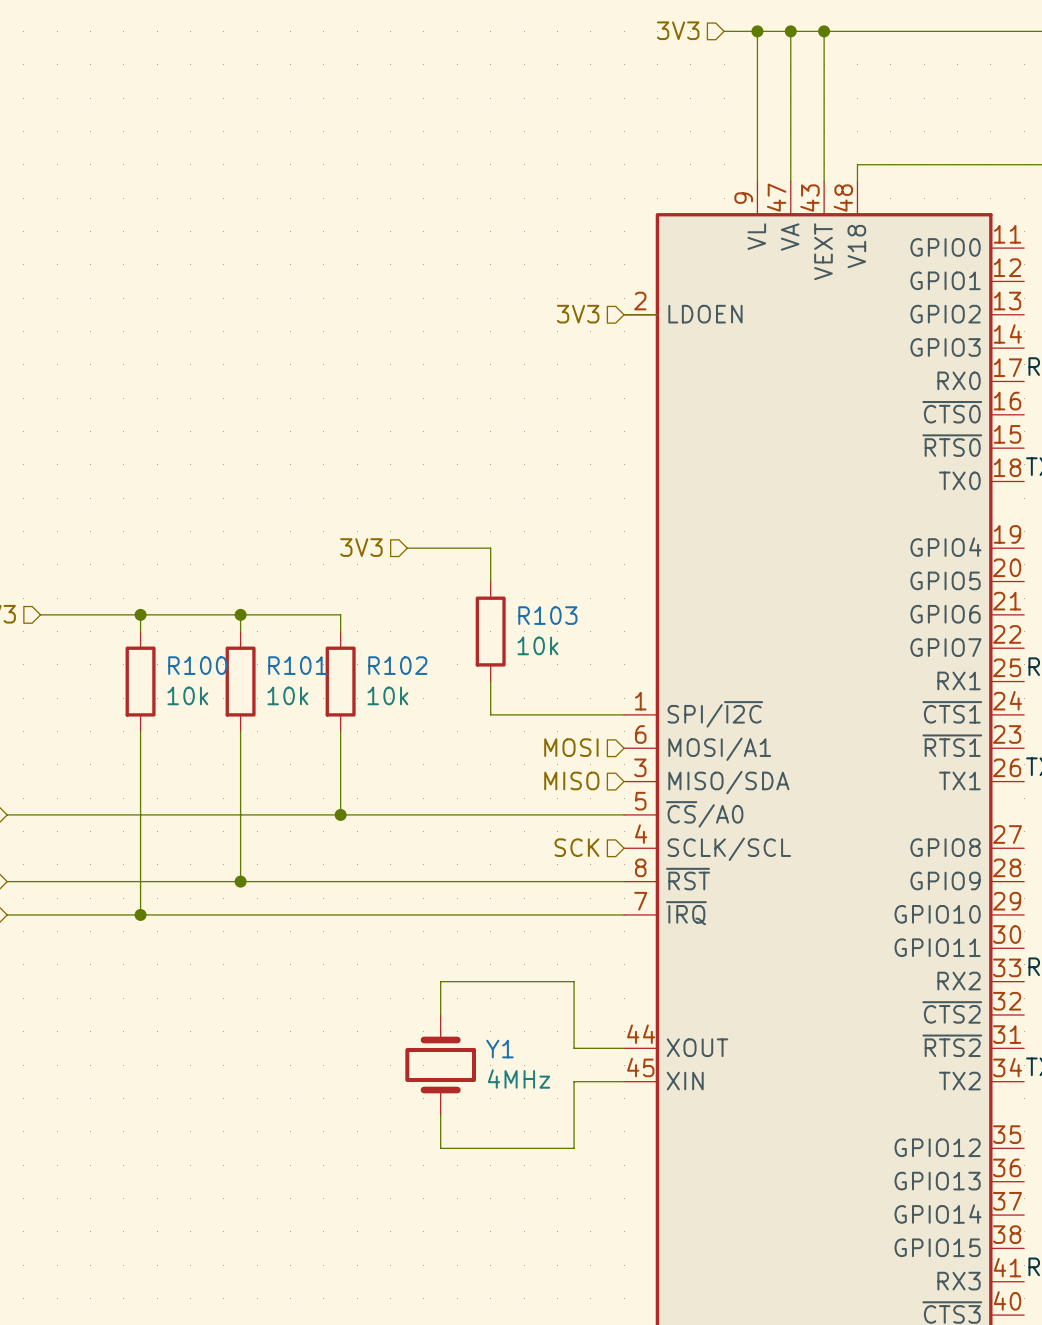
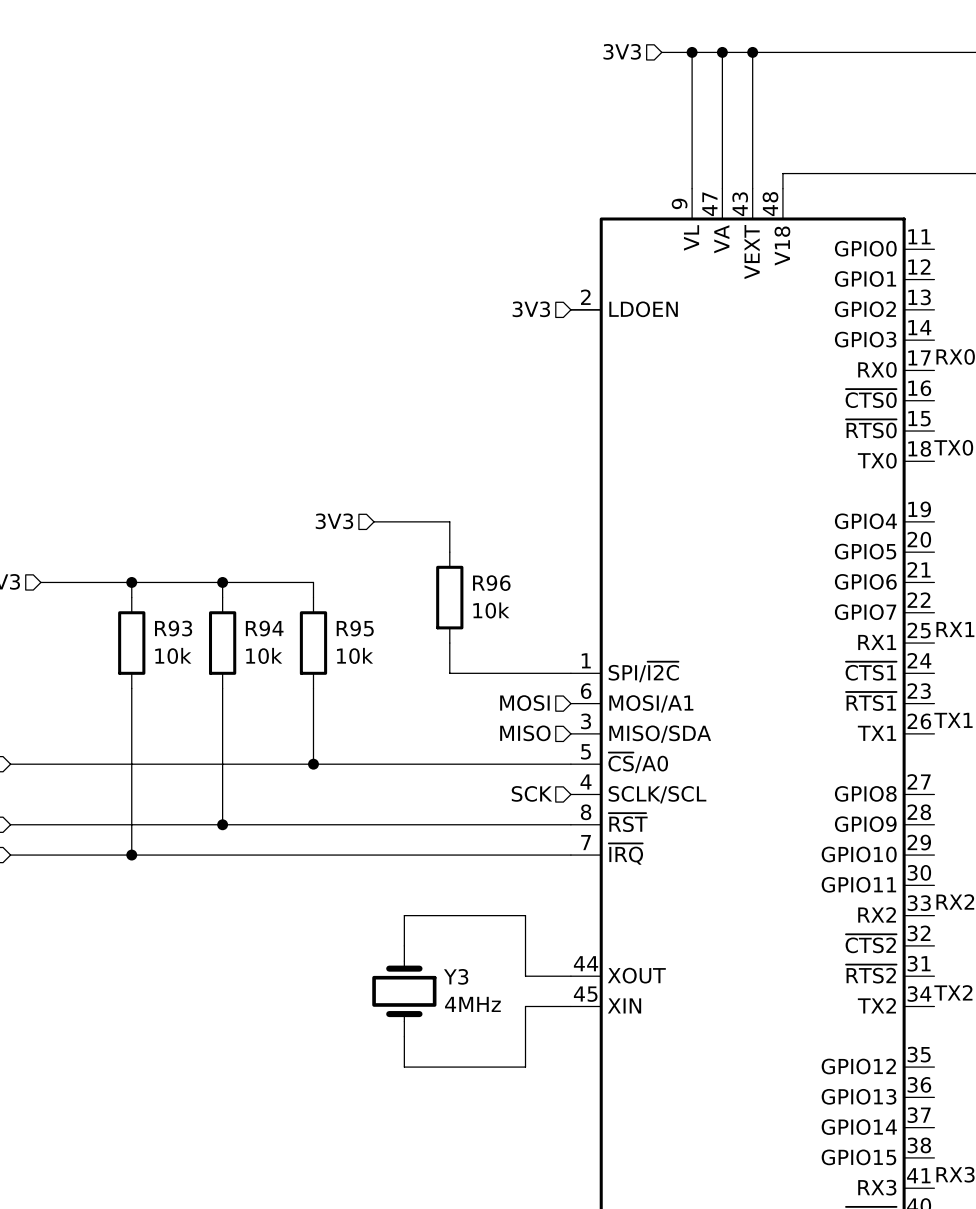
R103 name: R103 (547, 615) -> R96 (491, 583)
R100 name: R100 (197, 665) -> R93 (173, 628)
R101 name: R101 (297, 665) -> R94 (264, 628)
R102 name: R102 (397, 665) -> R95 (355, 628)
Y1 name: Y1 (499, 1049) -> Y3 (456, 976)

